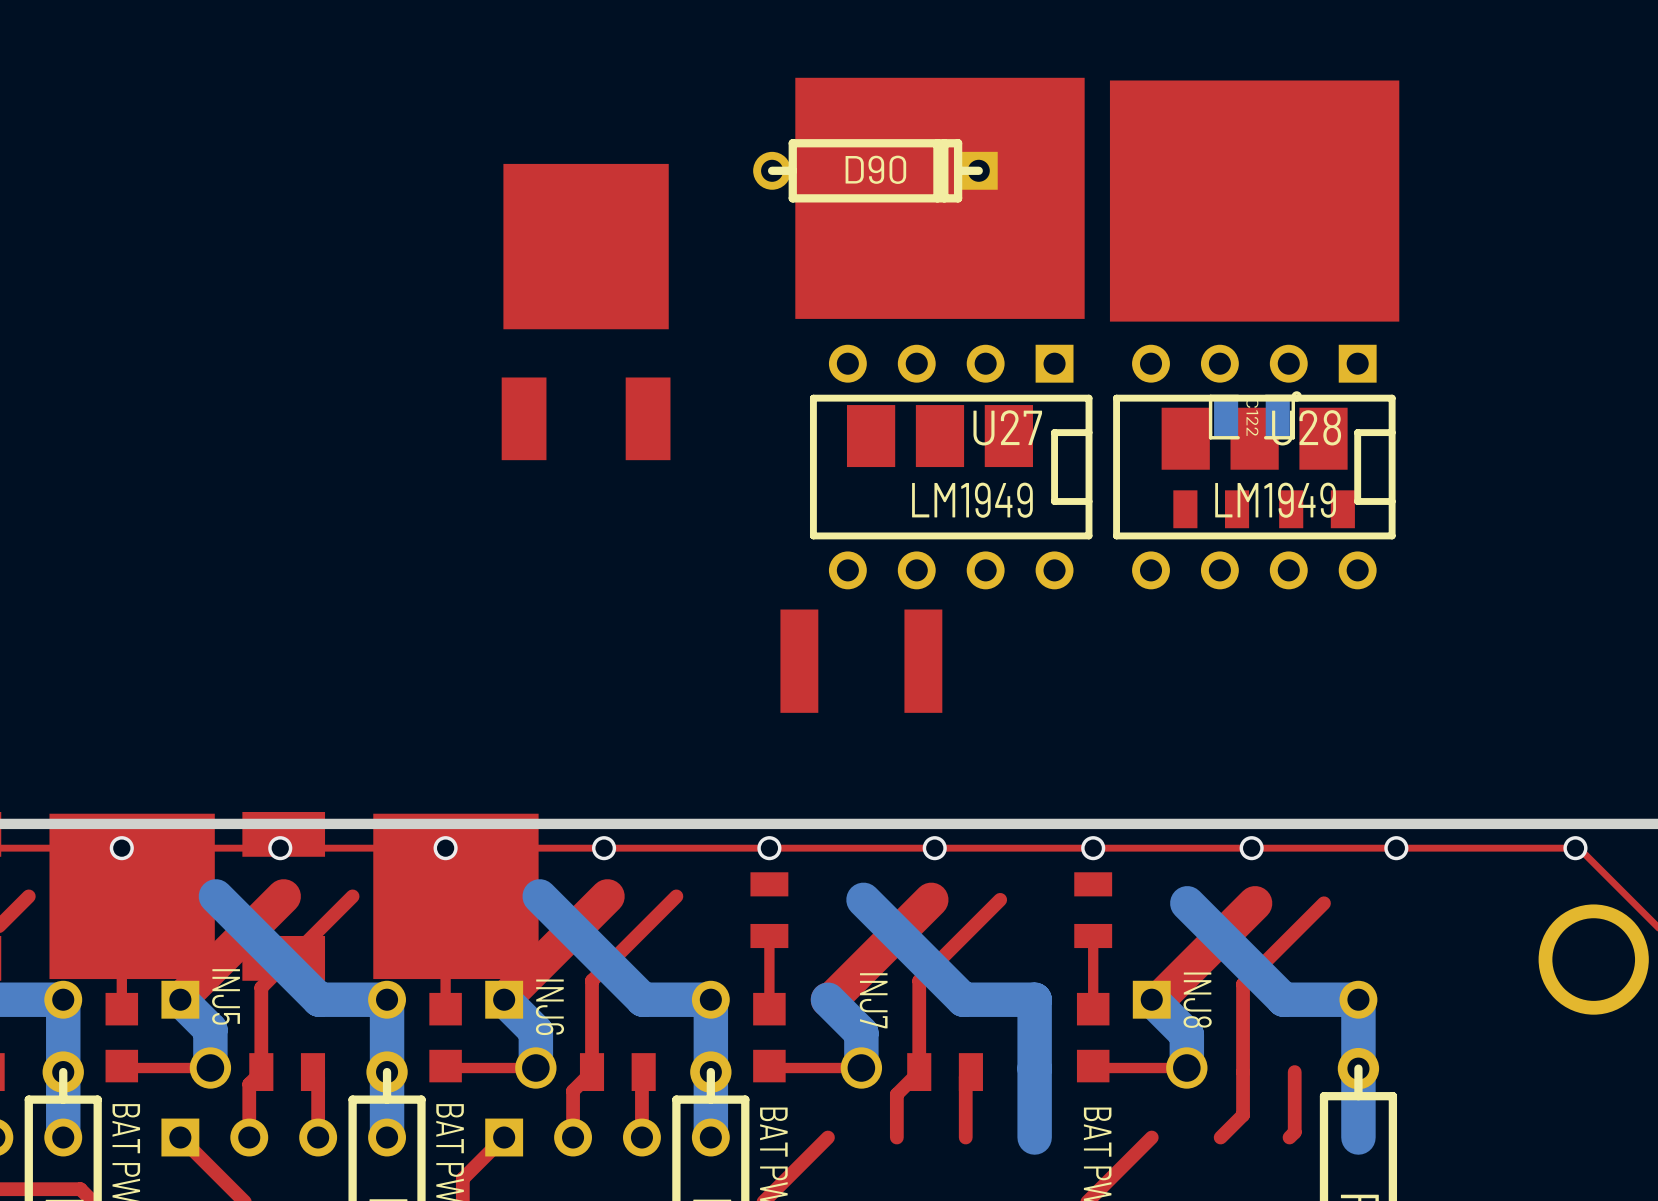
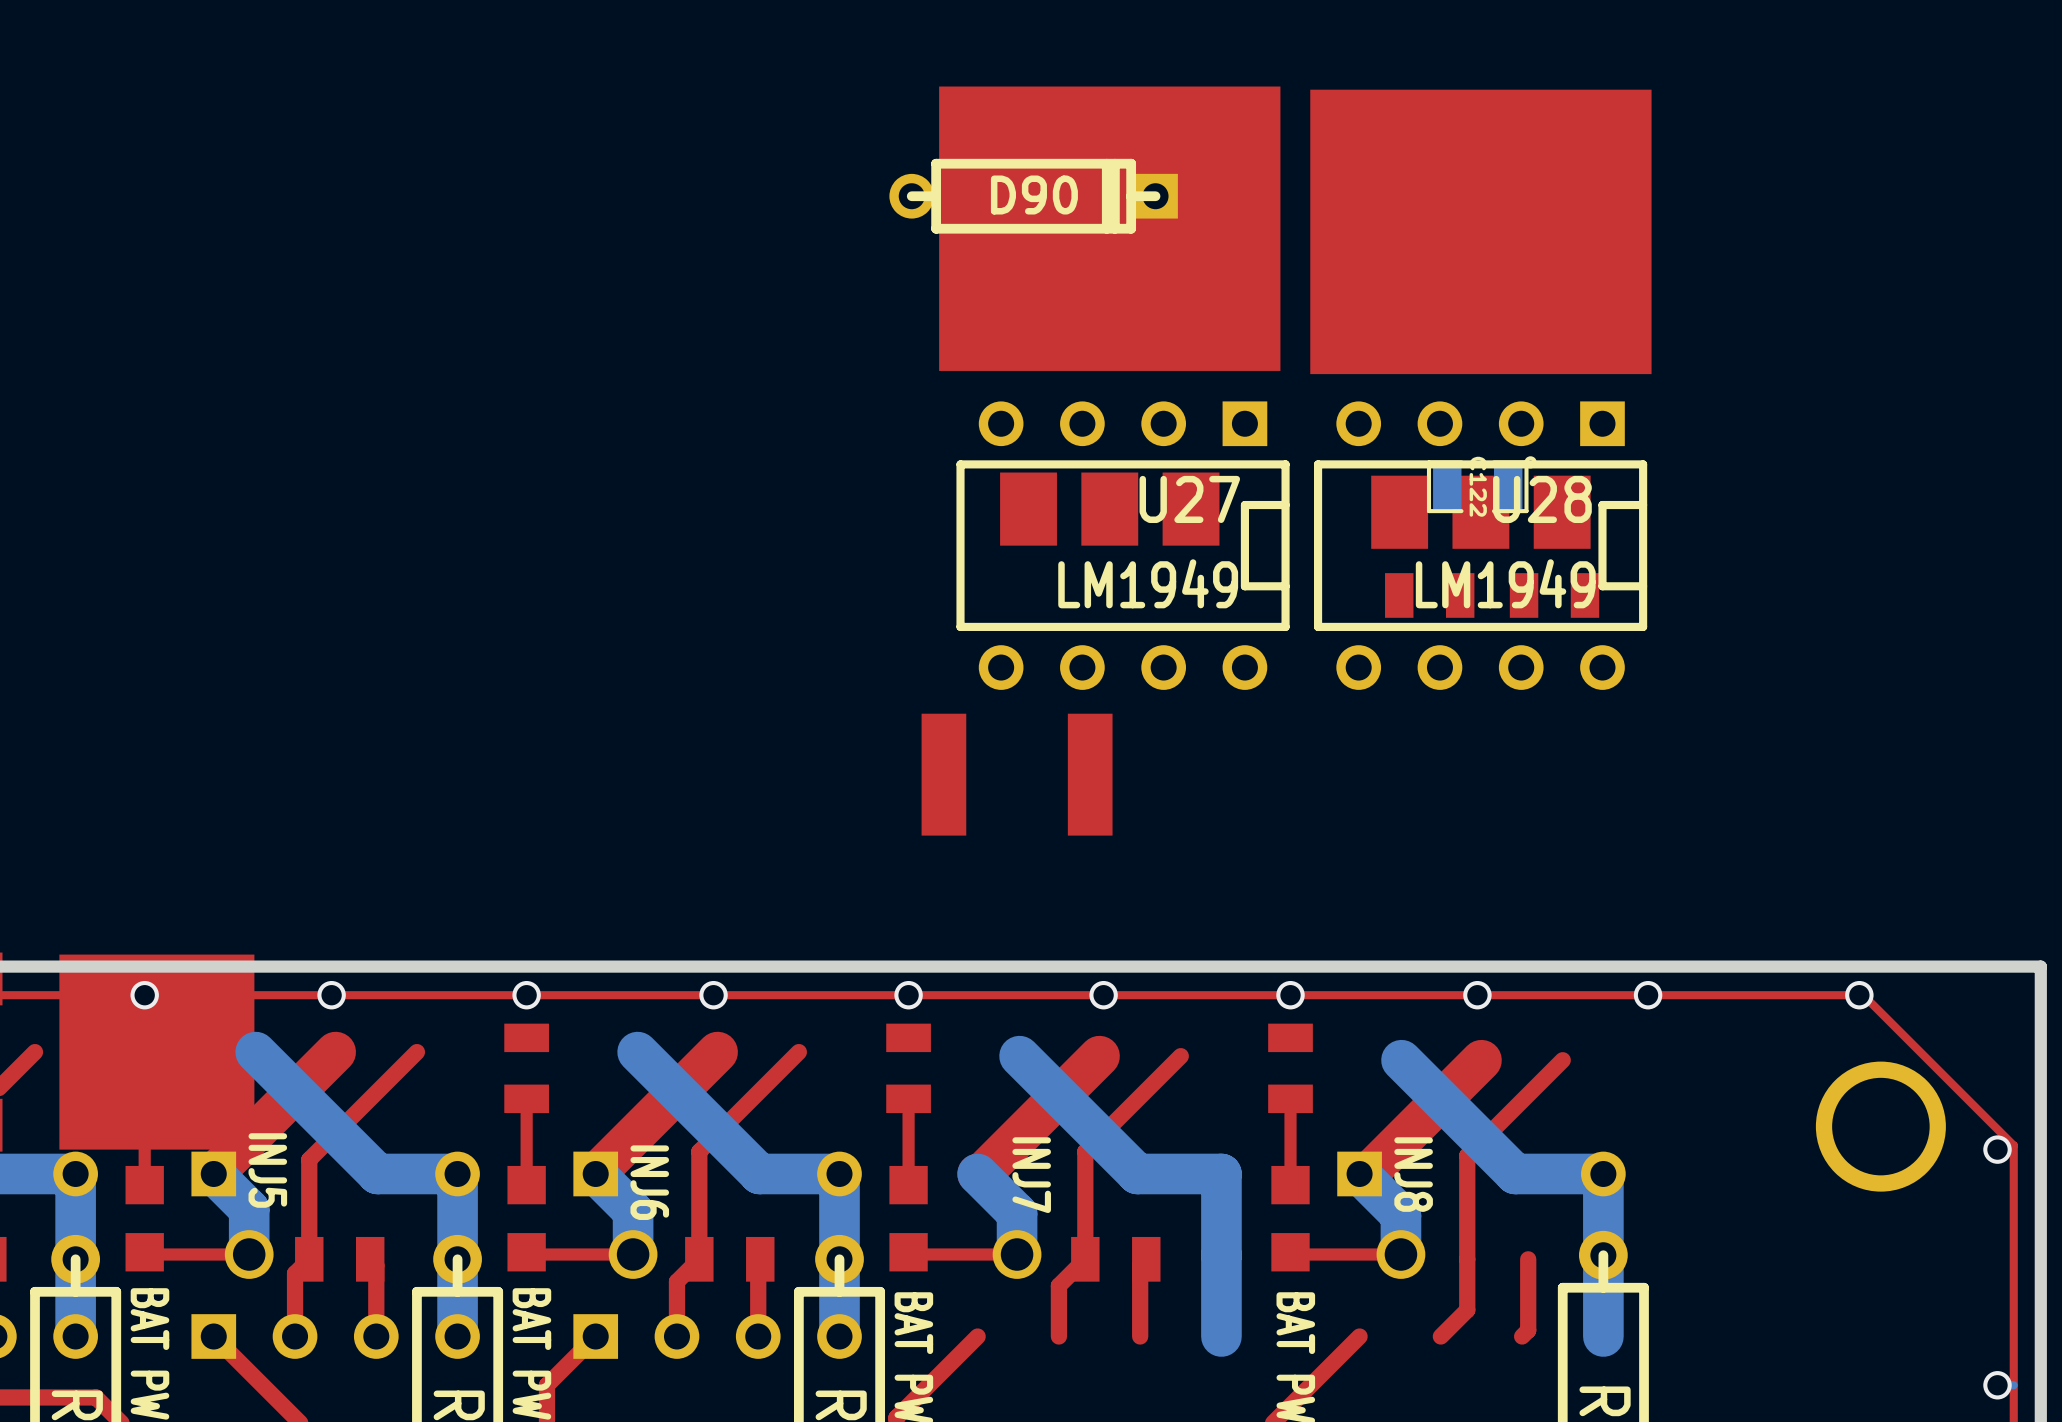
part: (586, 312) -> none
part: (390, 896) -> none

